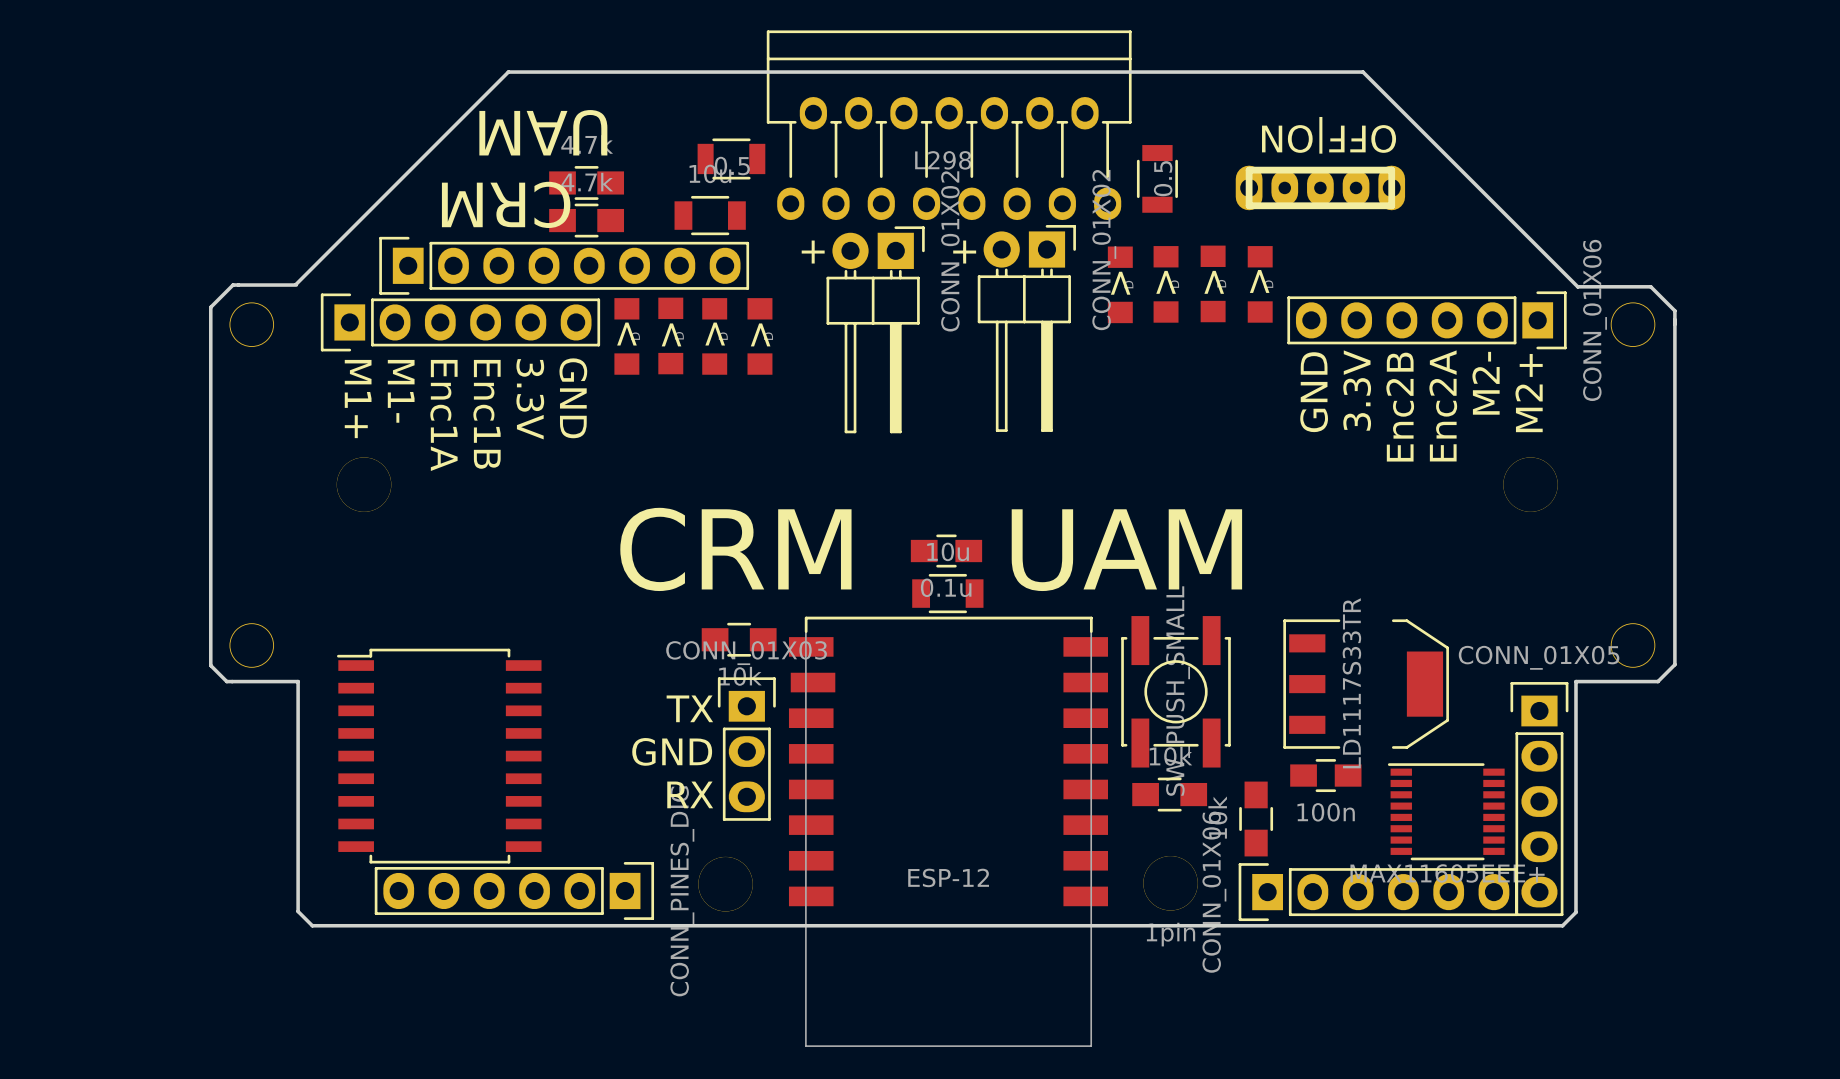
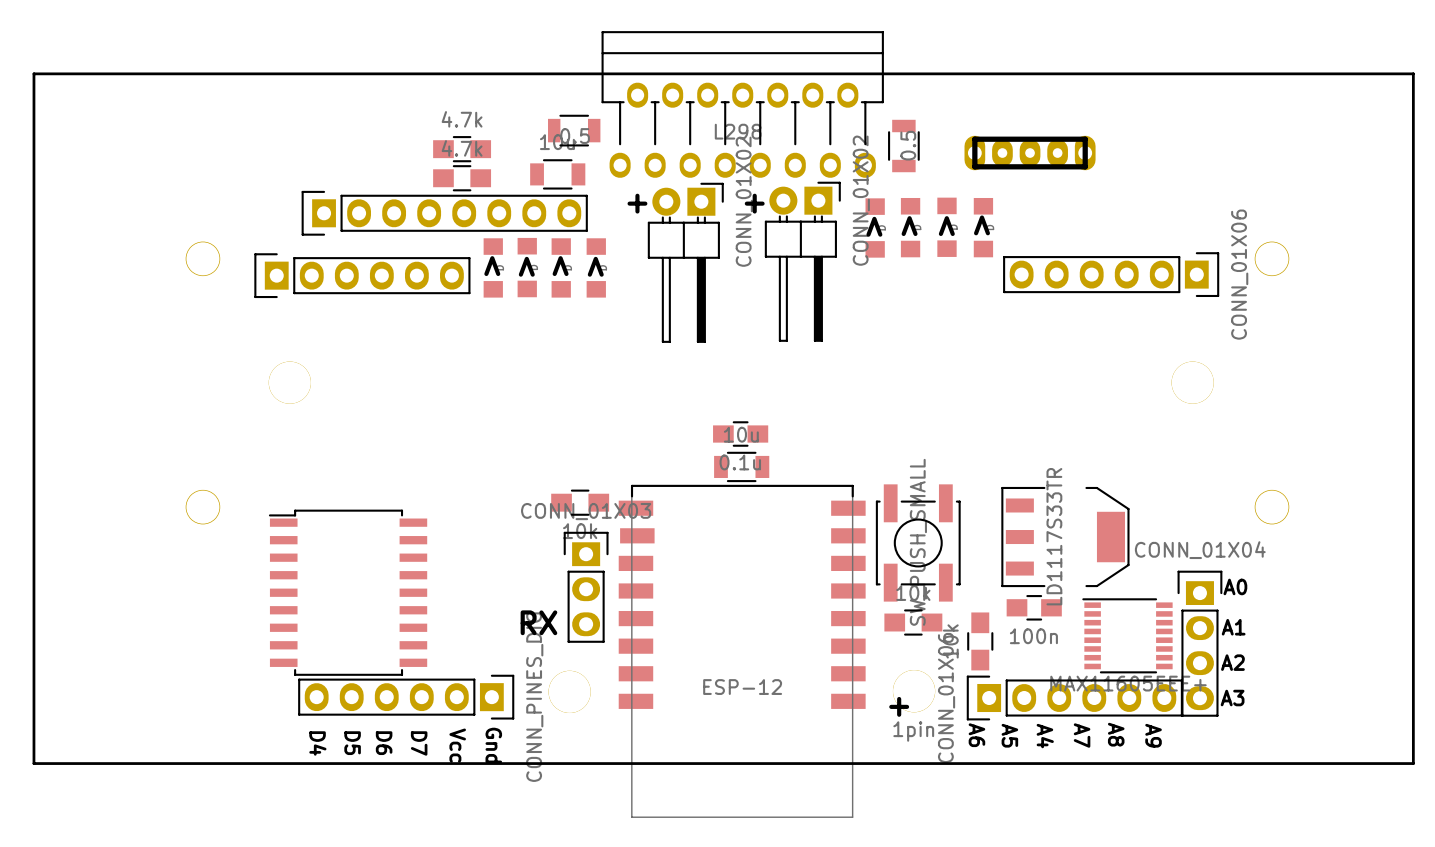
board edge: none -> (33, 73) (33, 763) (1413, 763) (1413, 73) (33, 73)
text: UAM (543, 132) -> none
text: OFF|ON (1329, 135) -> none
text: CRM (506, 204) -> none
board edge: (296, 284) (508, 72) (1363, 72) (1577, 286) (1650, 286) (1674, 310) (1674, 664) (1657, 681) (1575, 681) (1575, 912) (1562, 925) (312, 925) (298, 911) (298, 681) (226, 681) (210, 665) (210, 307) (233, 285) (296, 285) -> none
part position: (1427, 320) -> (1111, 274)
part position: (460, 322) -> (362, 275)
text: M2- (1486, 383) -> none
text: 3.3V (1357, 390) -> none
text: M1- (401, 391) -> none
text: GND (1314, 392) -> none
text: M2+ (1529, 393) -> none
text: GND (573, 398) -> none
text: M1+ (358, 399) -> none
text: 3.3V (530, 399) -> none
text: Enc2A (1443, 405) -> none
text: Enc2B (1400, 407) -> none
text: Enc1B (487, 414) -> none
text: Enc1A (443, 415) -> none
text: CRM UAM (931, 549) -> none
text: TX (689, 708) -> none
text: none -> A0 (1235, 586)
text: GND (672, 751) -> none
part: CONN_01X05 (1539, 799) -> none
text: none -> A1 (1233, 627)
part: none -> CONN_01X04 (1199, 643)
text: none -> A2 (1232, 662)
text: none -> A3 (1232, 698)
text: none -> + (899, 706)
text: none -> A8 (1116, 734)
text: none -> A6 (976, 735)
text: none -> A5 (1009, 735)
text: none -> A7 (1082, 735)
text: none -> A9 (1153, 735)
text: none -> A4 (1045, 736)
text: none -> D4 (317, 743)
text: none -> D5 (352, 743)
text: none -> D6 (384, 743)
text: none -> D7 (419, 743)
text: none -> Vcc (457, 745)
text: none -> Gnd (493, 745)

